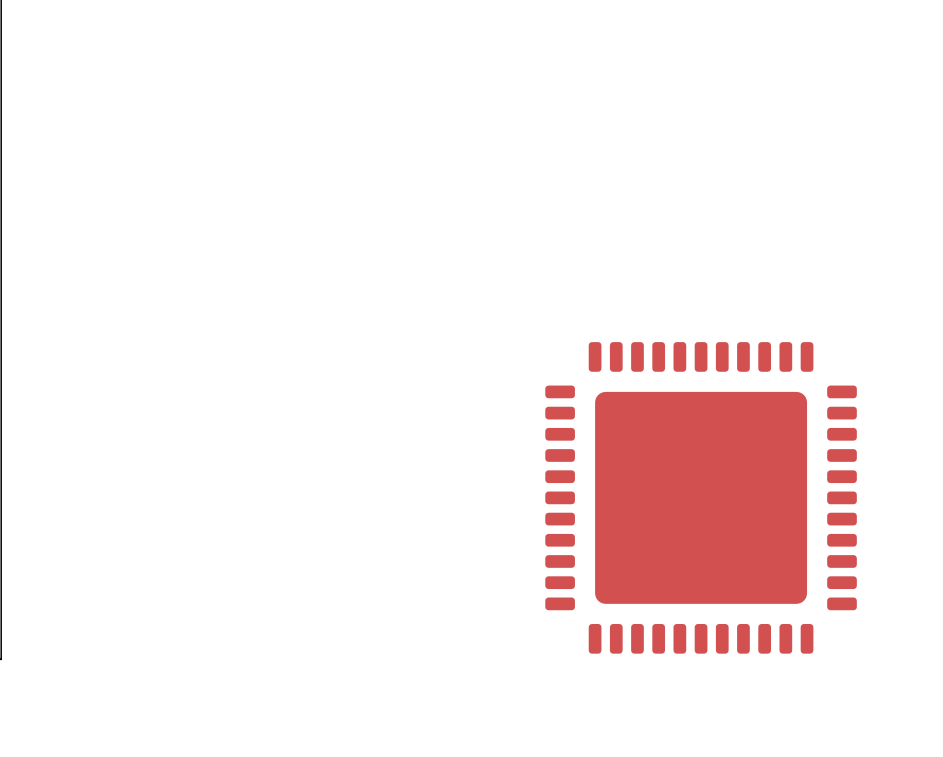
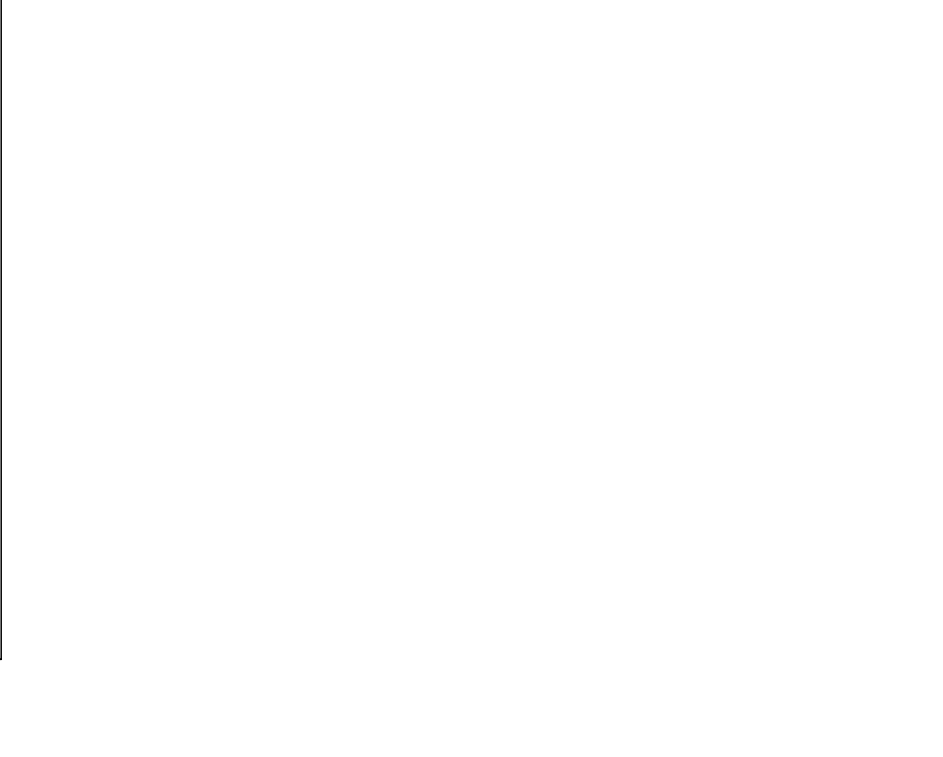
part: (701, 497) -> none

